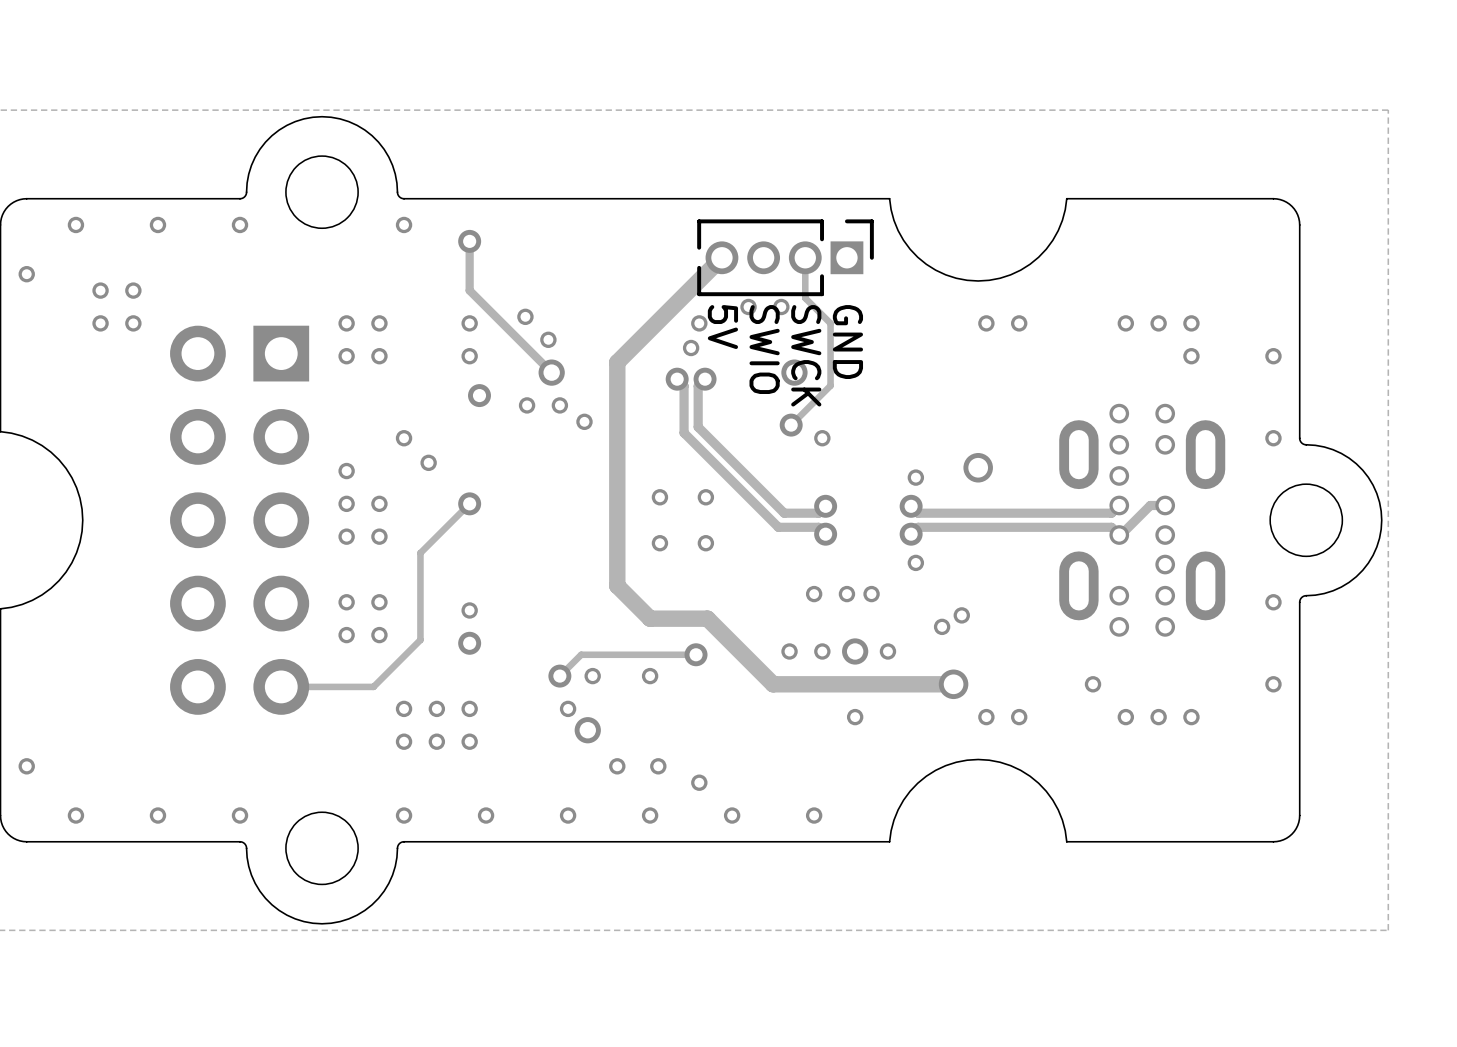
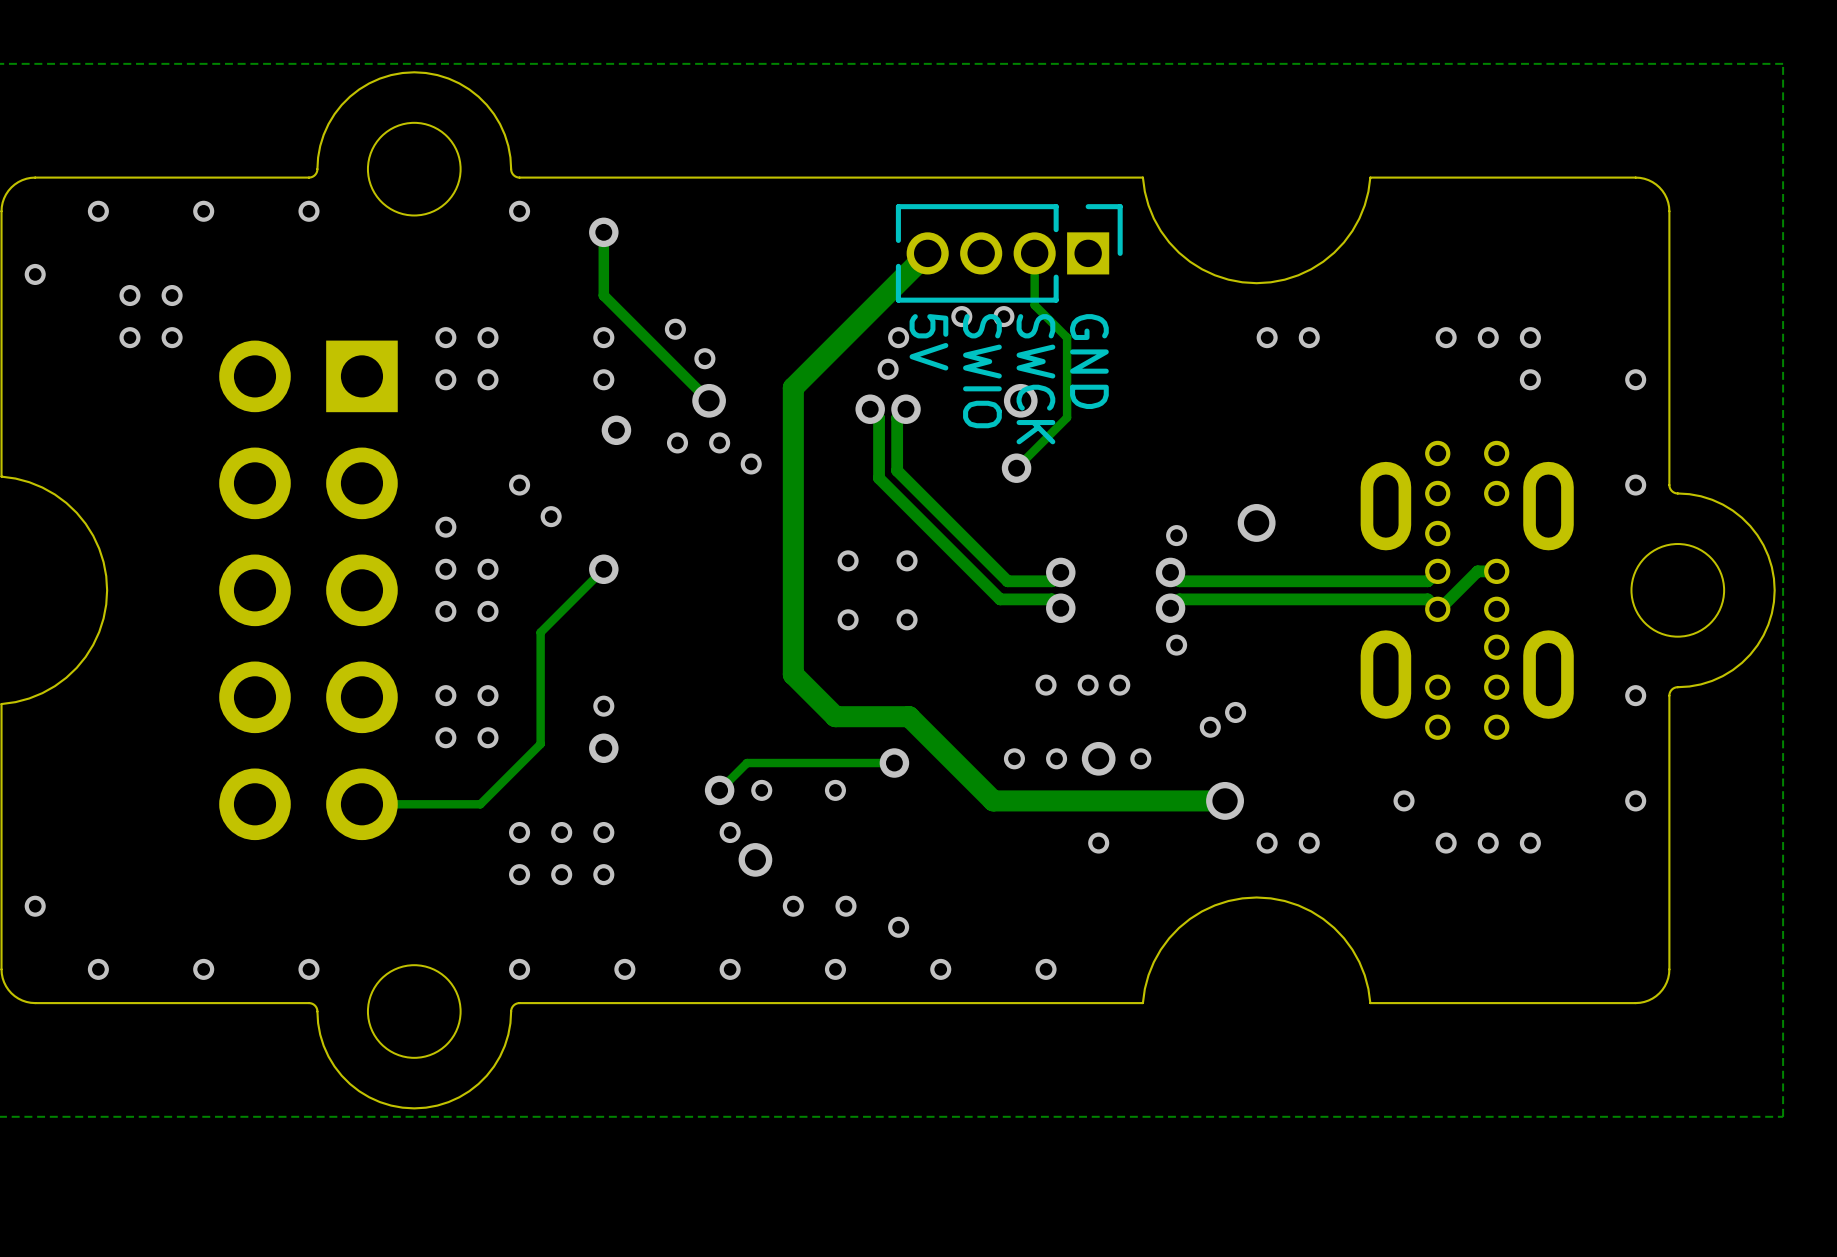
via: (822, 438) -> none

